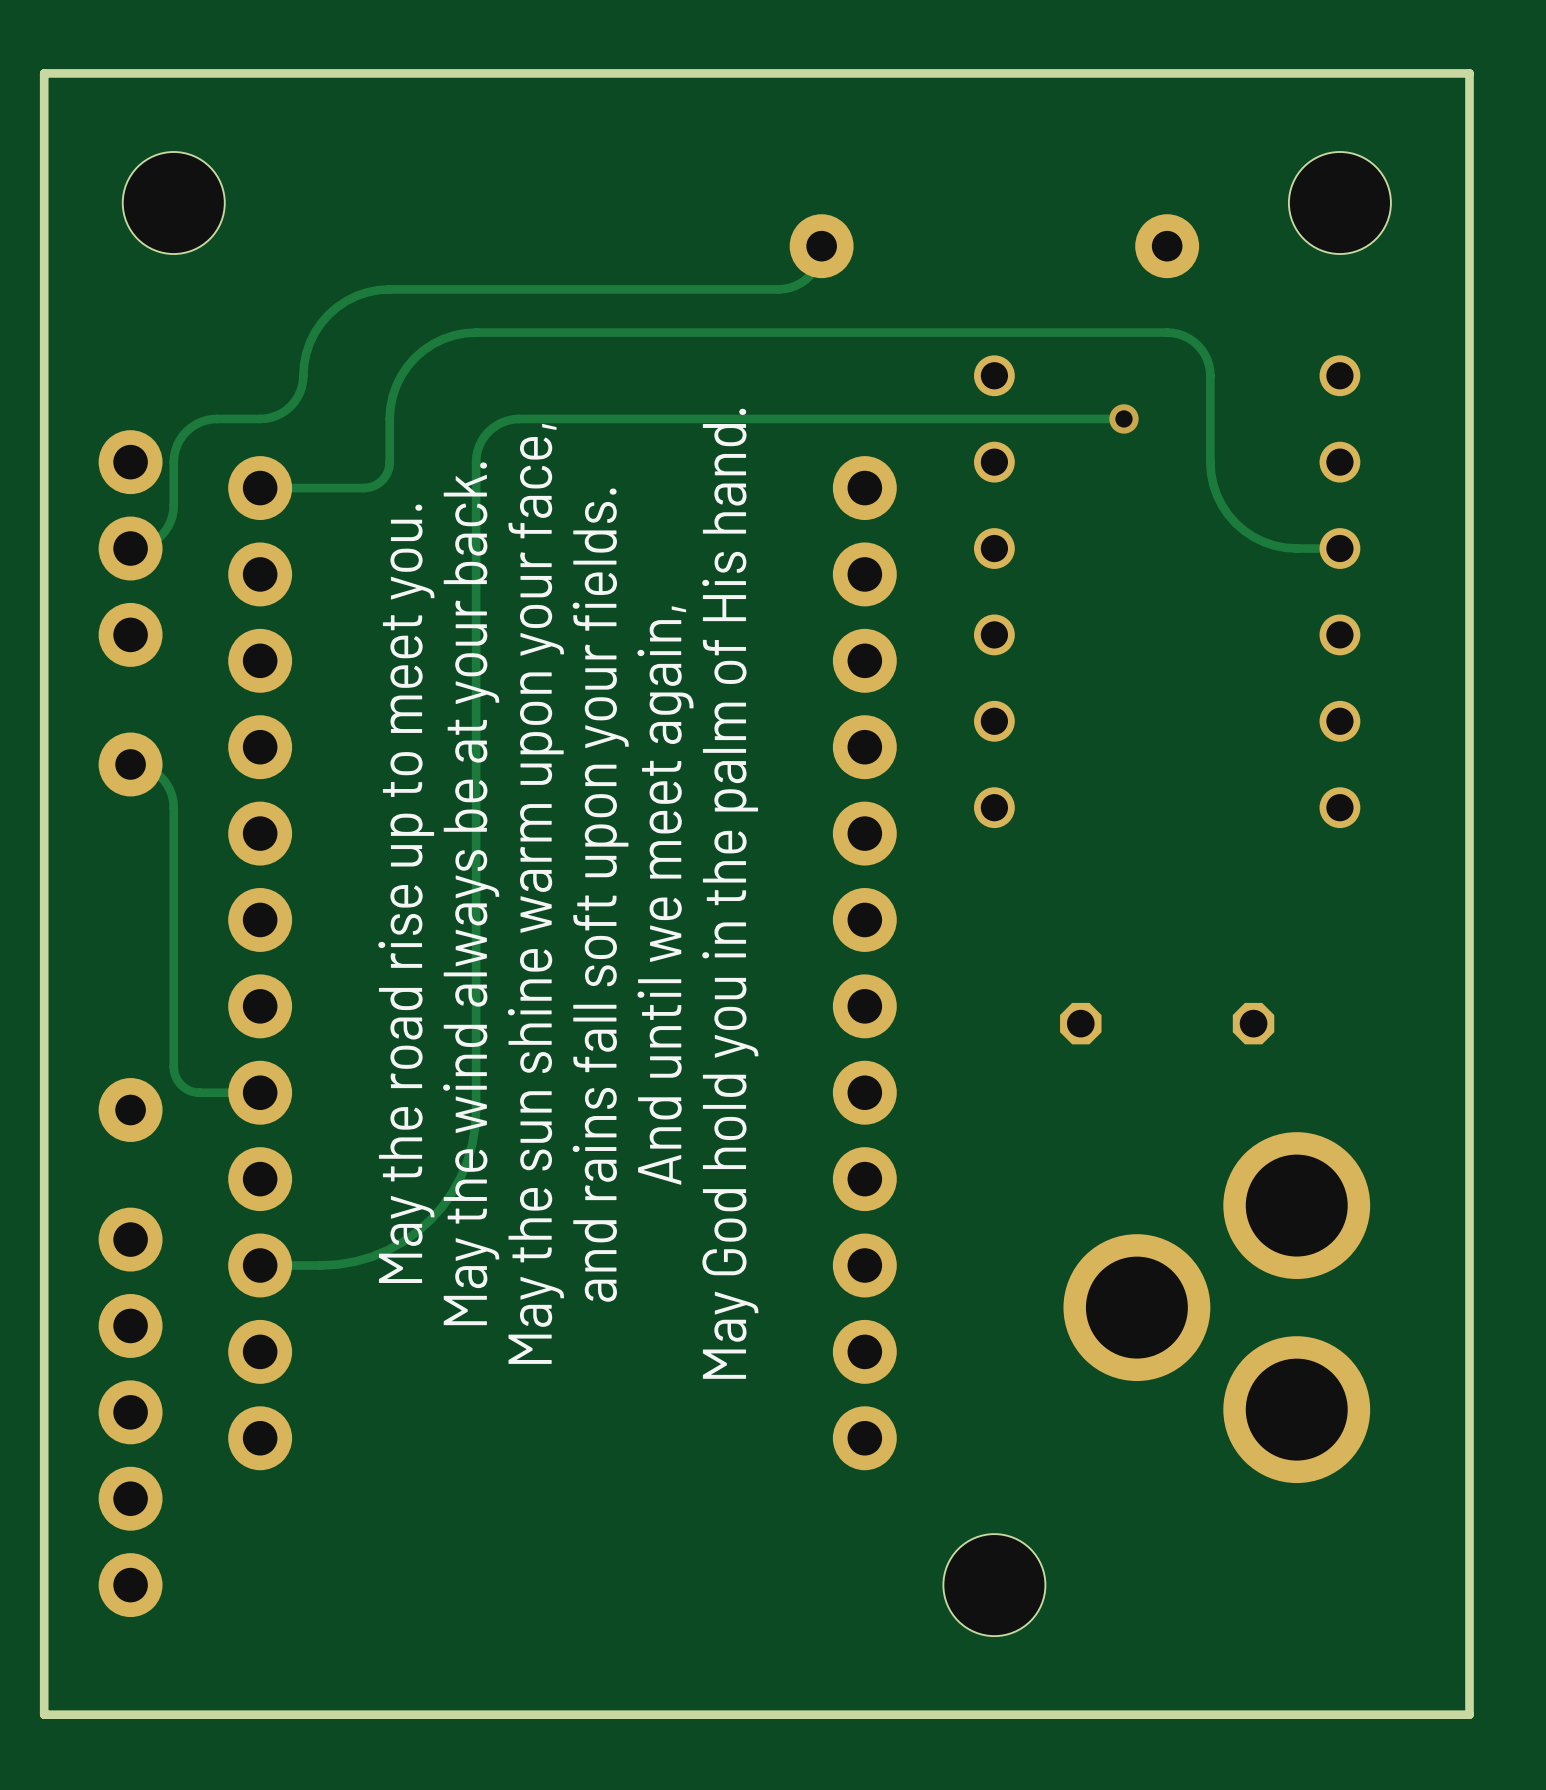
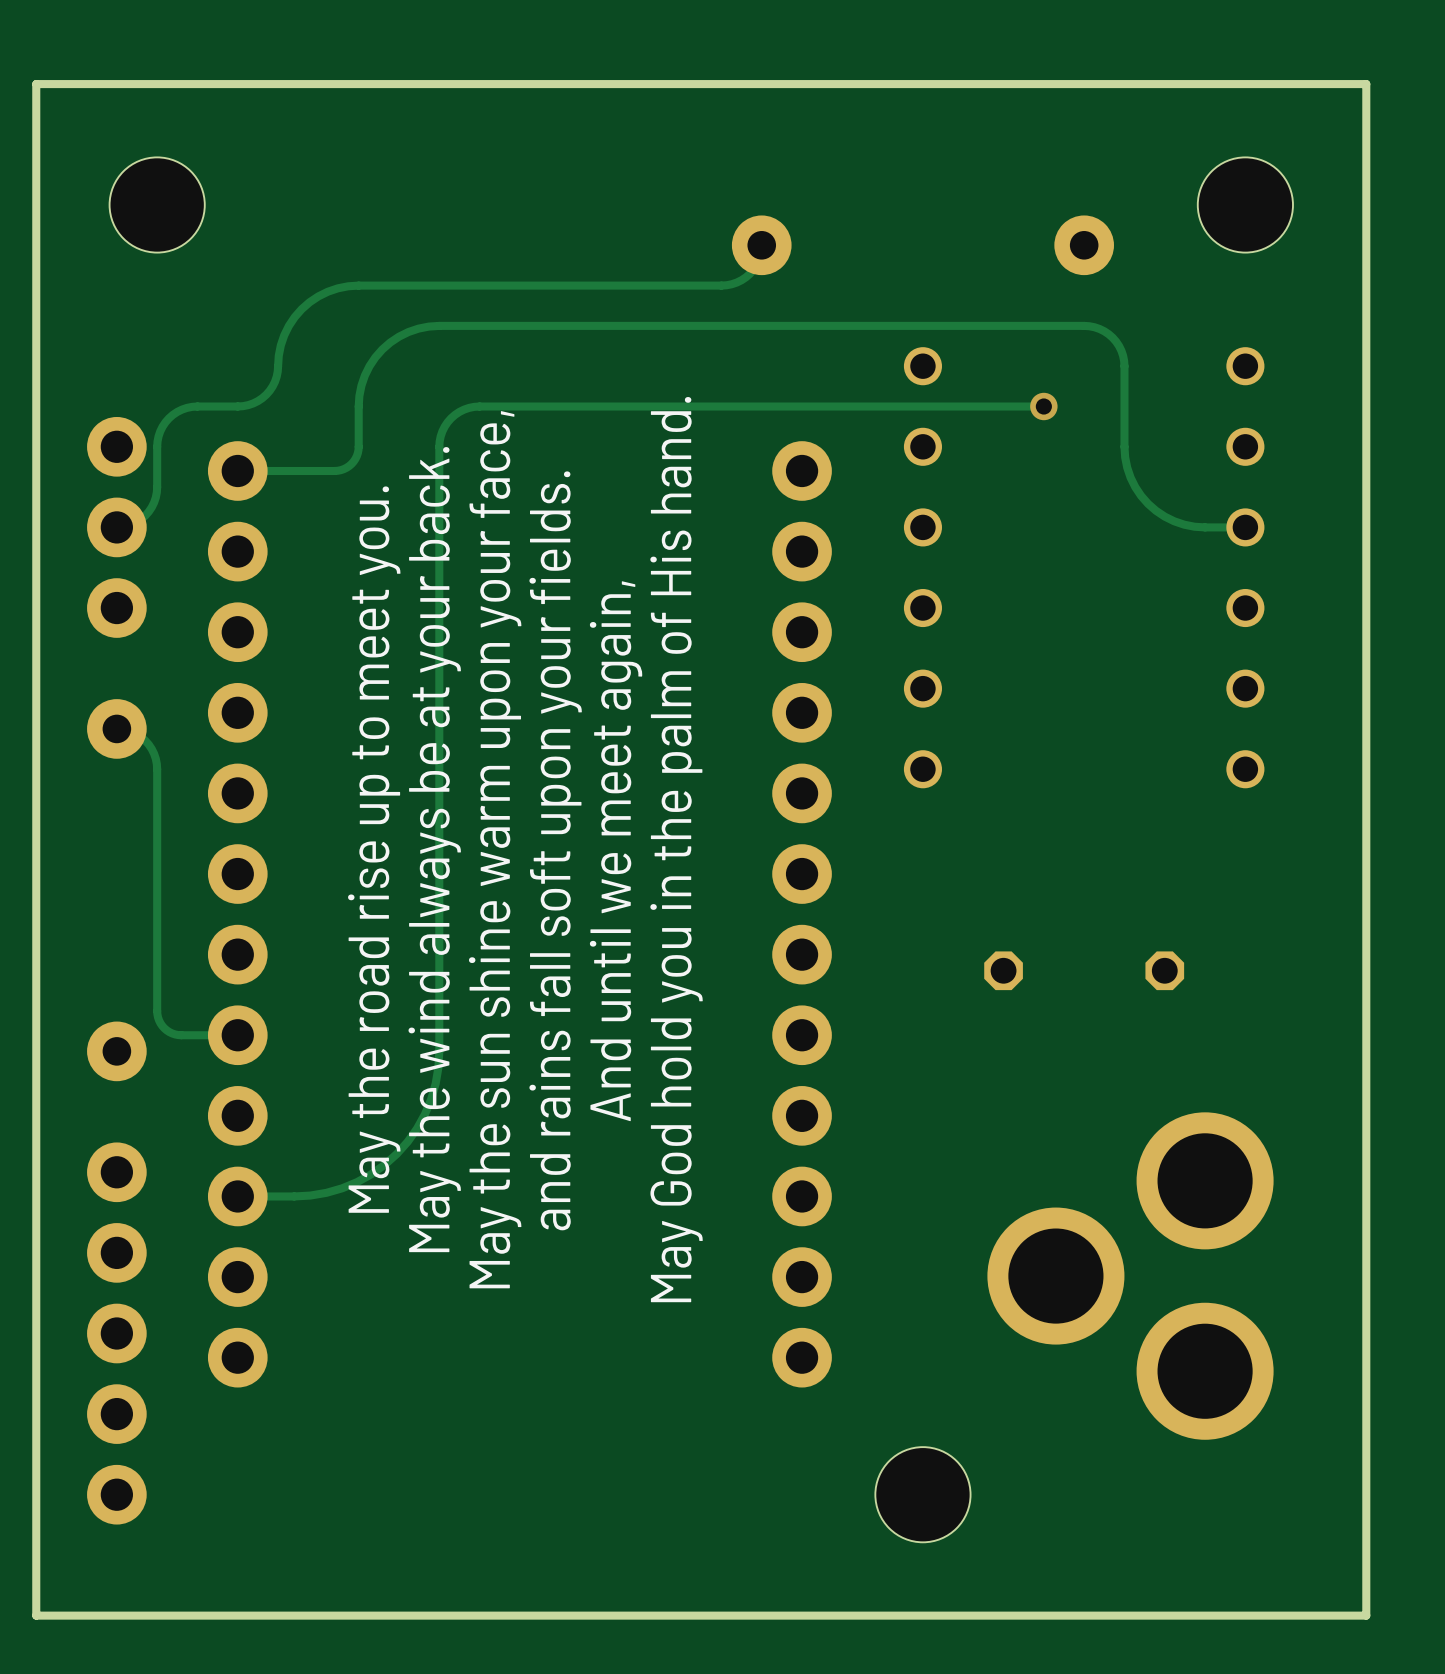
part position: (1216, 1307) -> (1130, 1276)

